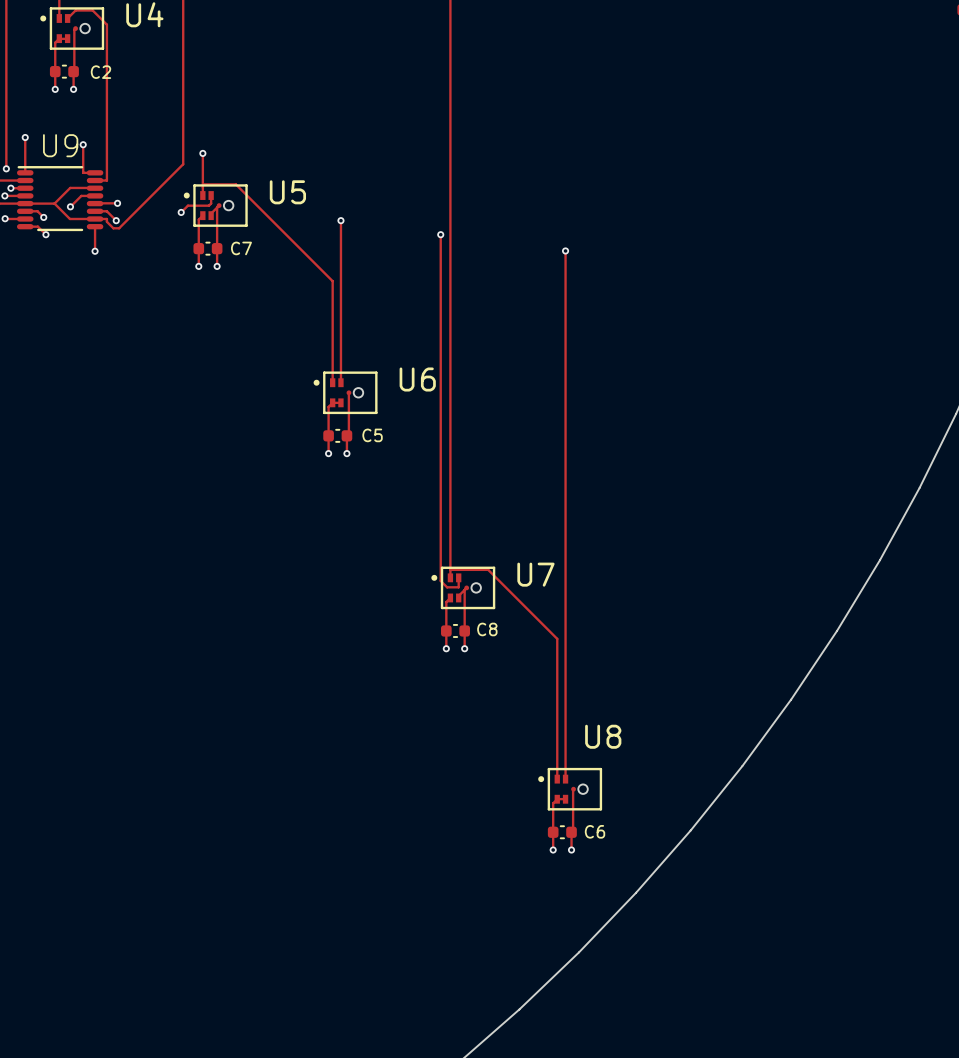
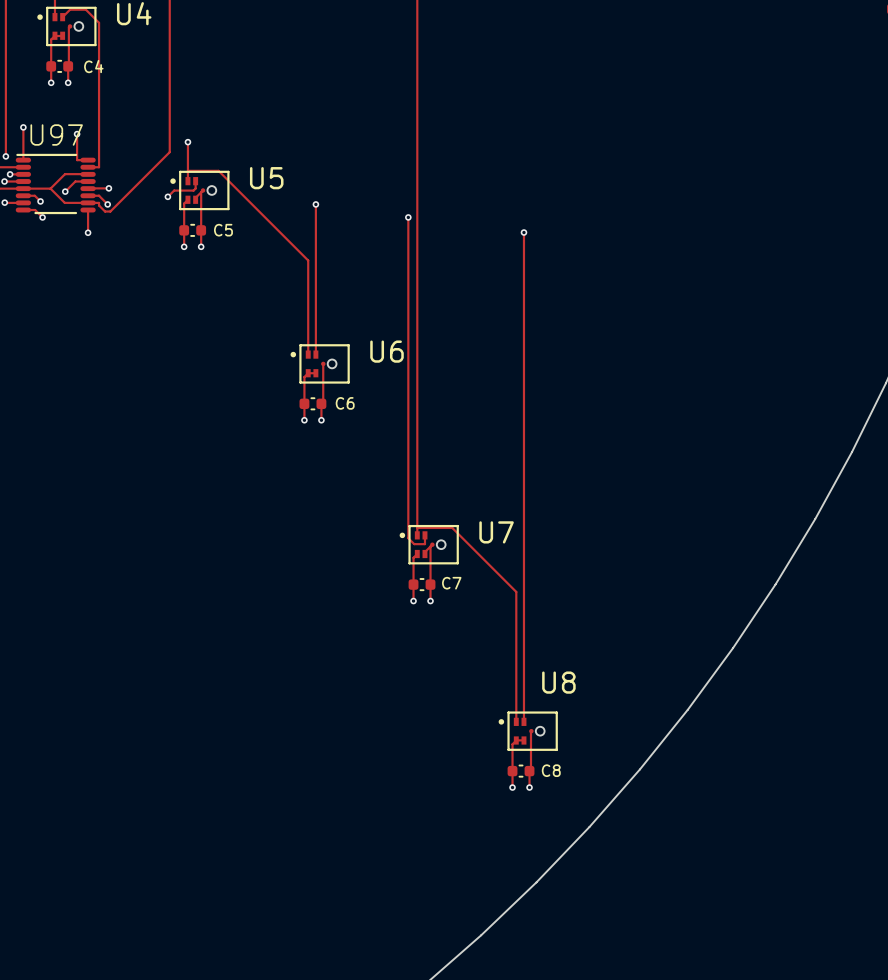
C2 name: C2 (100, 72) -> C4 (93, 66)
U9 name: U9 (60, 145) -> U97 (56, 135)
C7 name: C7 (241, 248) -> C5 (223, 230)
C5 name: C5 (372, 435) -> C6 (345, 403)
C8 name: C8 (487, 629) -> C7 (451, 583)
C6 name: C6 (595, 831) -> C8 (551, 770)

